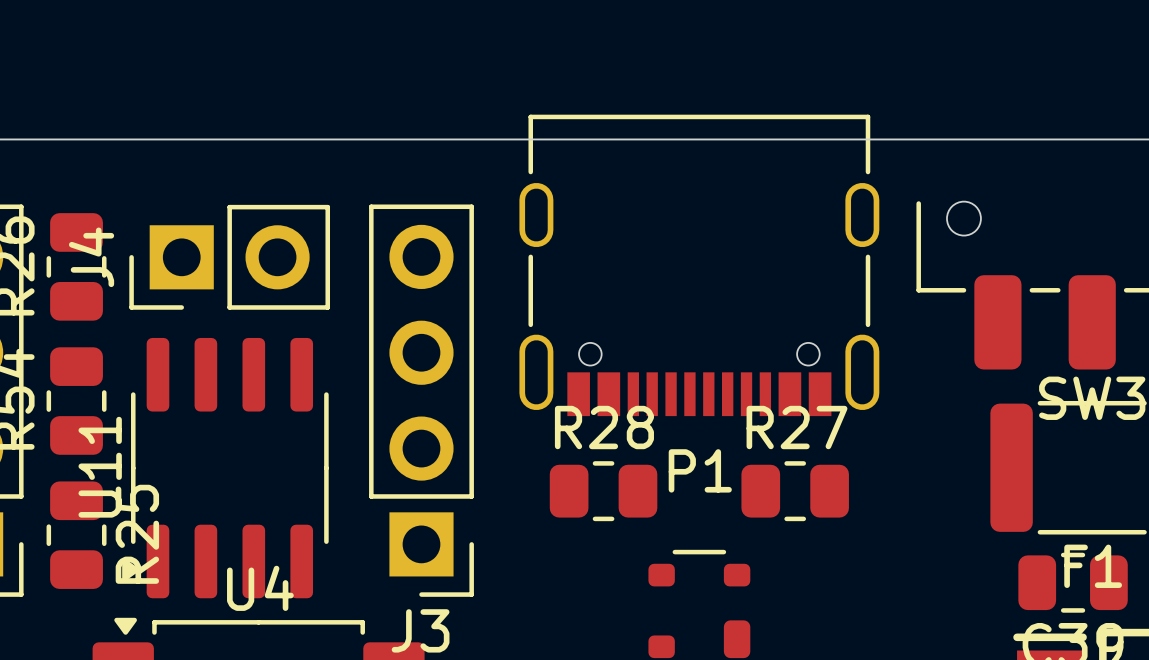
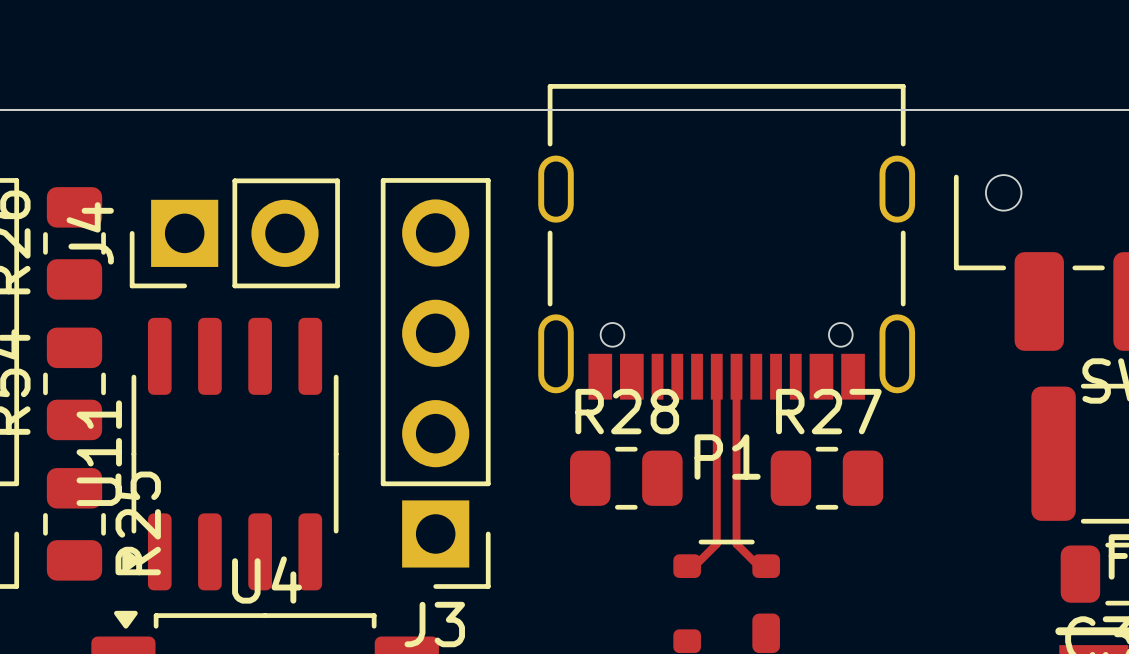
top track: none -> (716, 376) (716, 544) (694, 566) (687, 566)
top track: none -> (736, 376) (736, 544) (758, 566) (766, 566)

